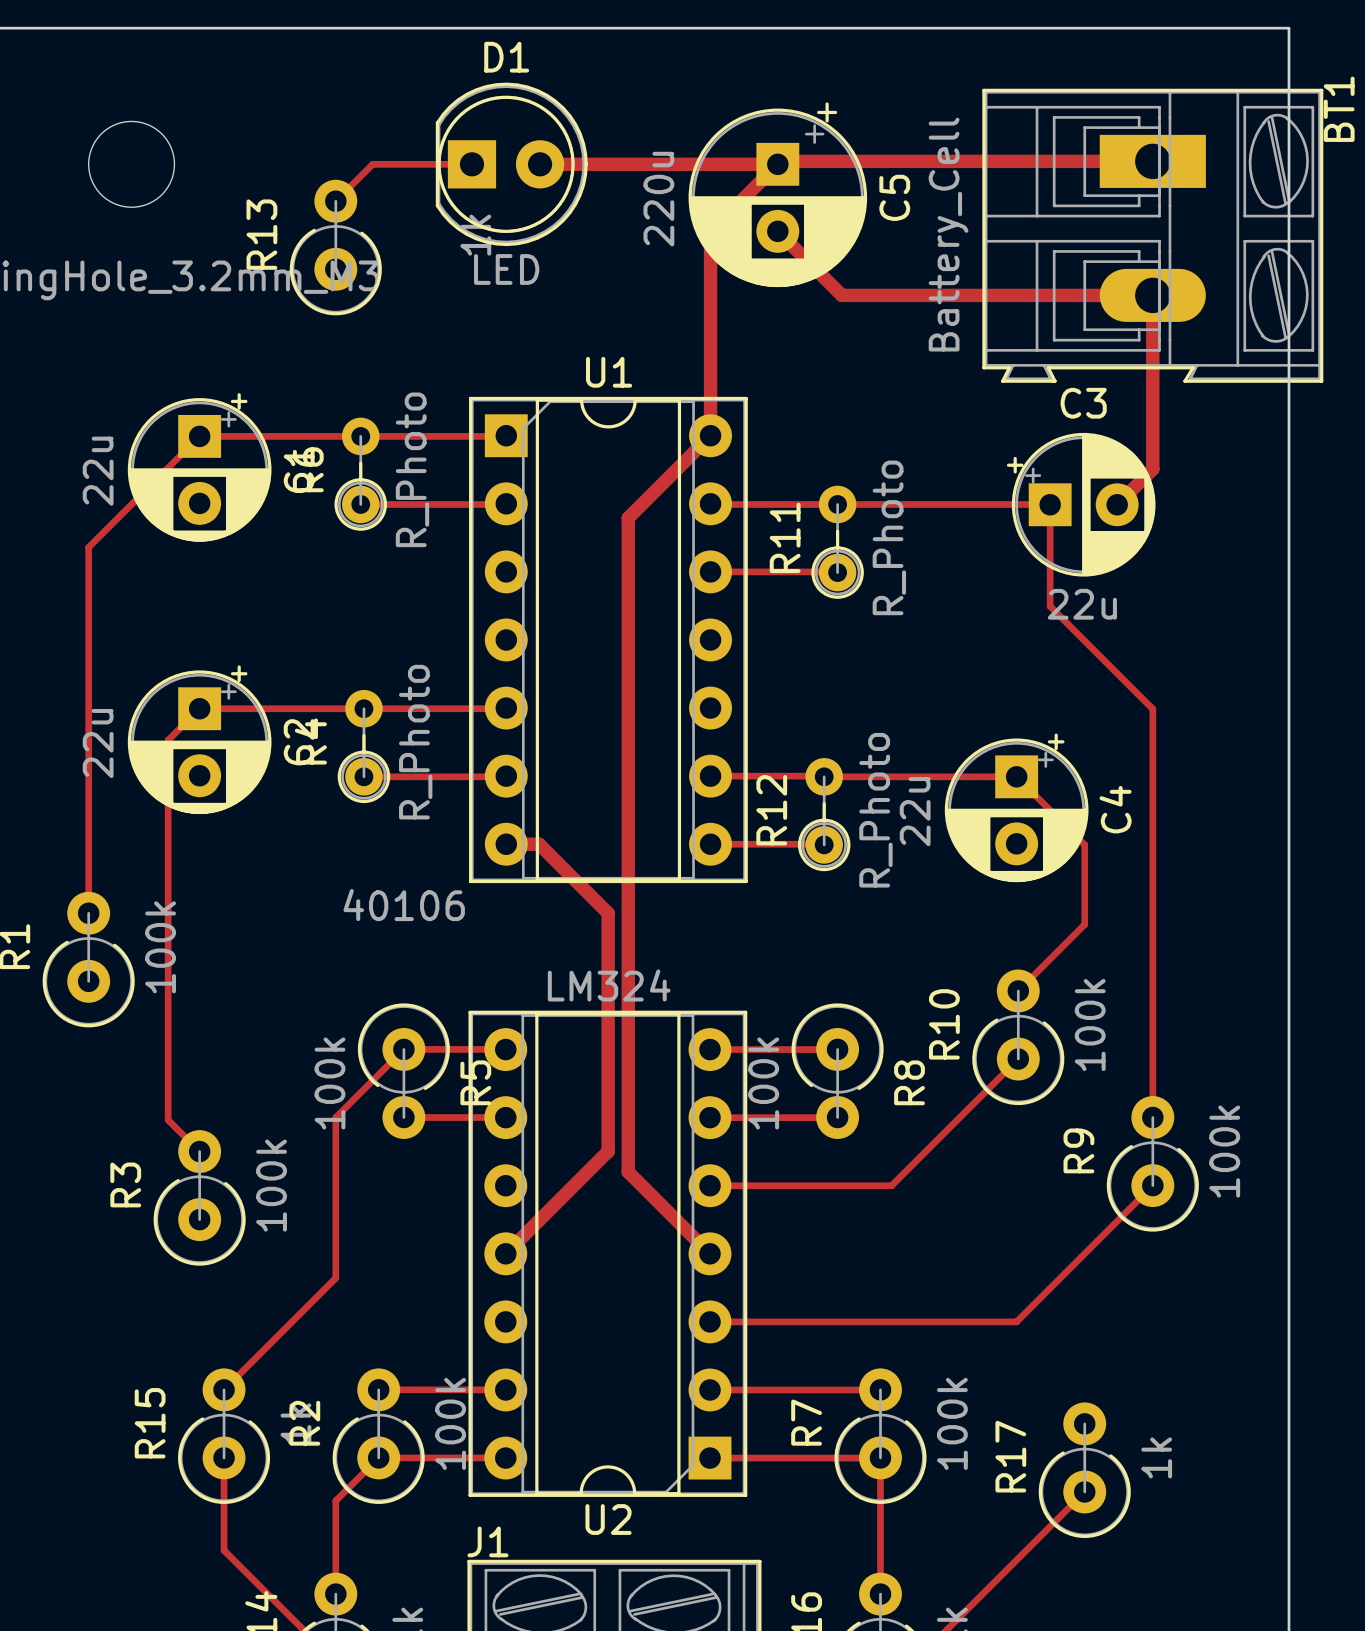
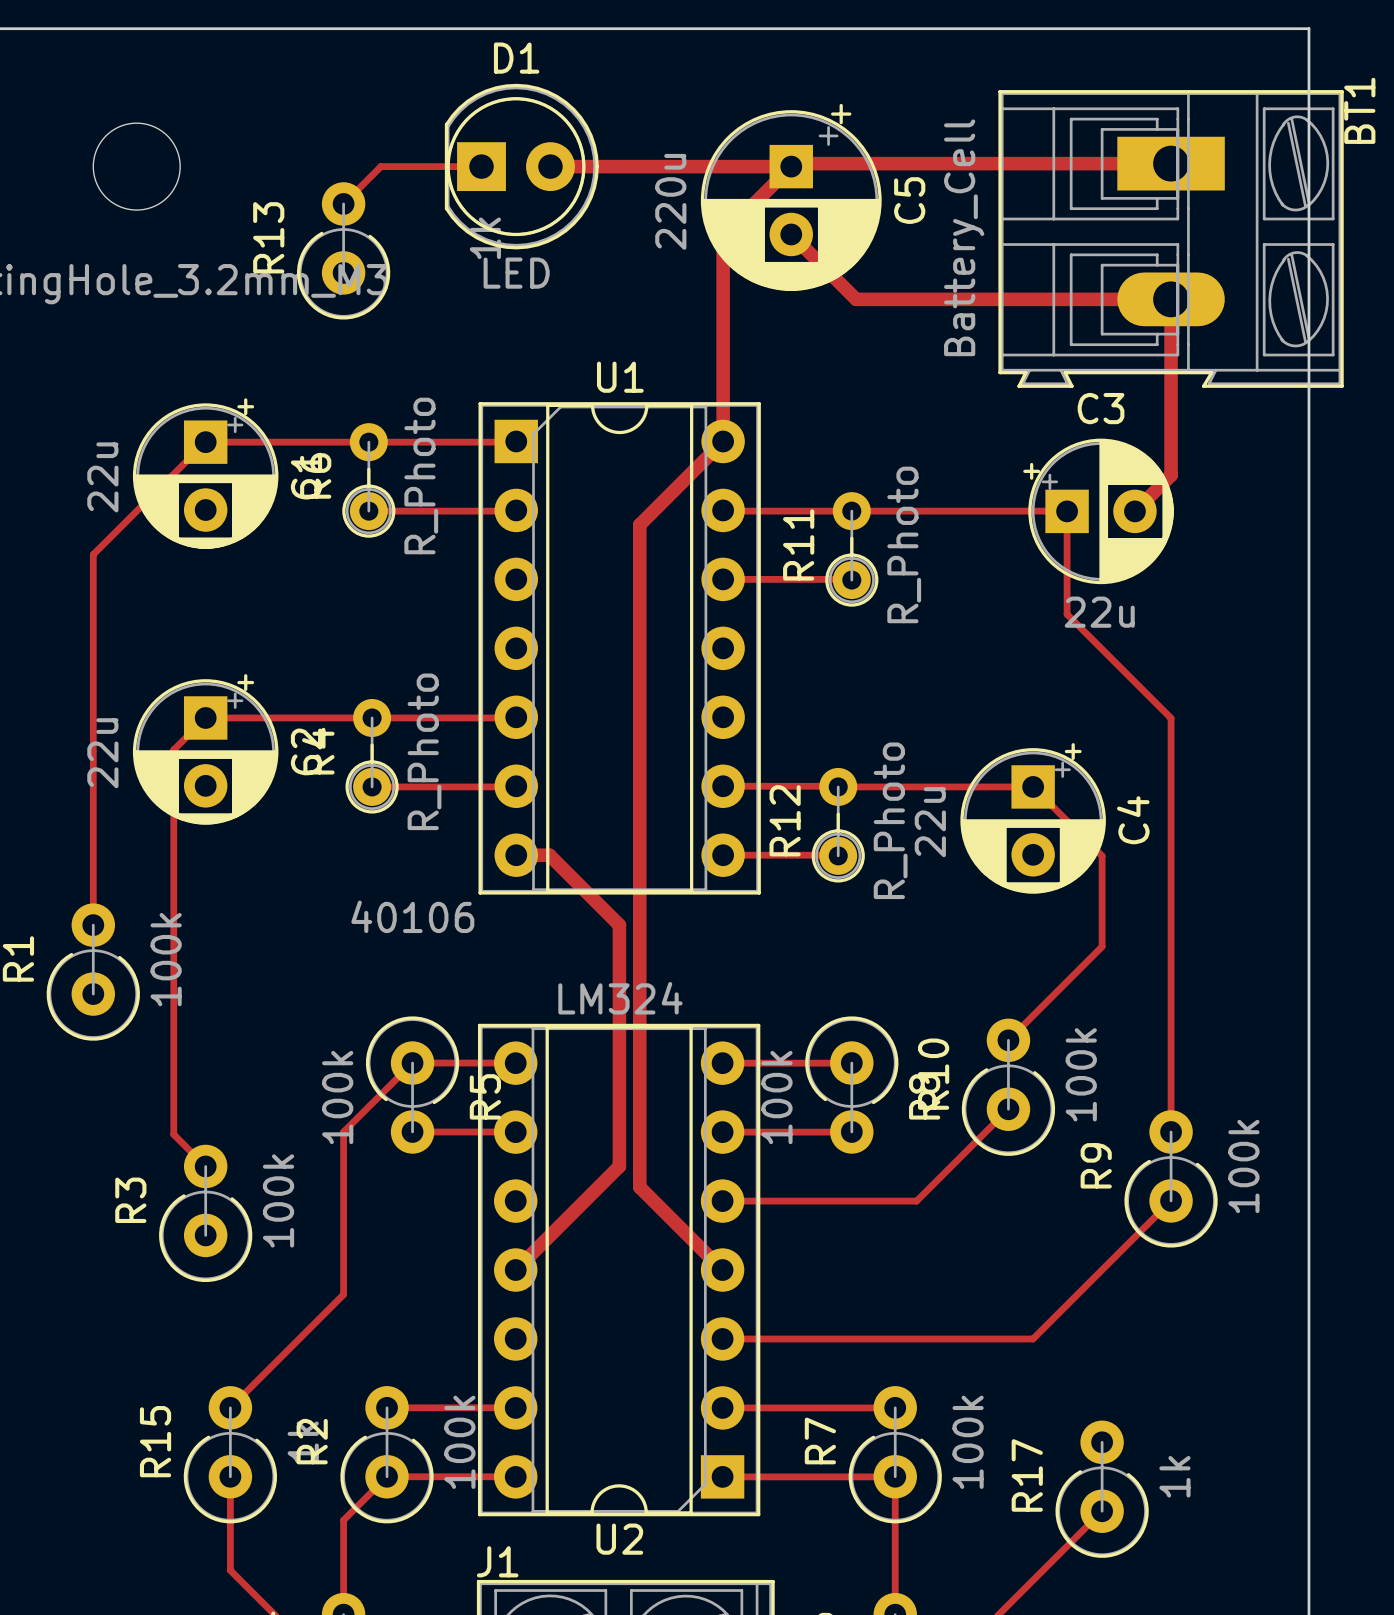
track: (1084, 924) (1018, 990) -> (1102, 936) (1102, 946) (1008, 1040)
R10 position: (1018, 1037) -> (1008, 1087)
track: (1016, 1049) (1018, 1059) (891, 1185) -> (1008, 1109) (916, 1201) (906, 1201)

